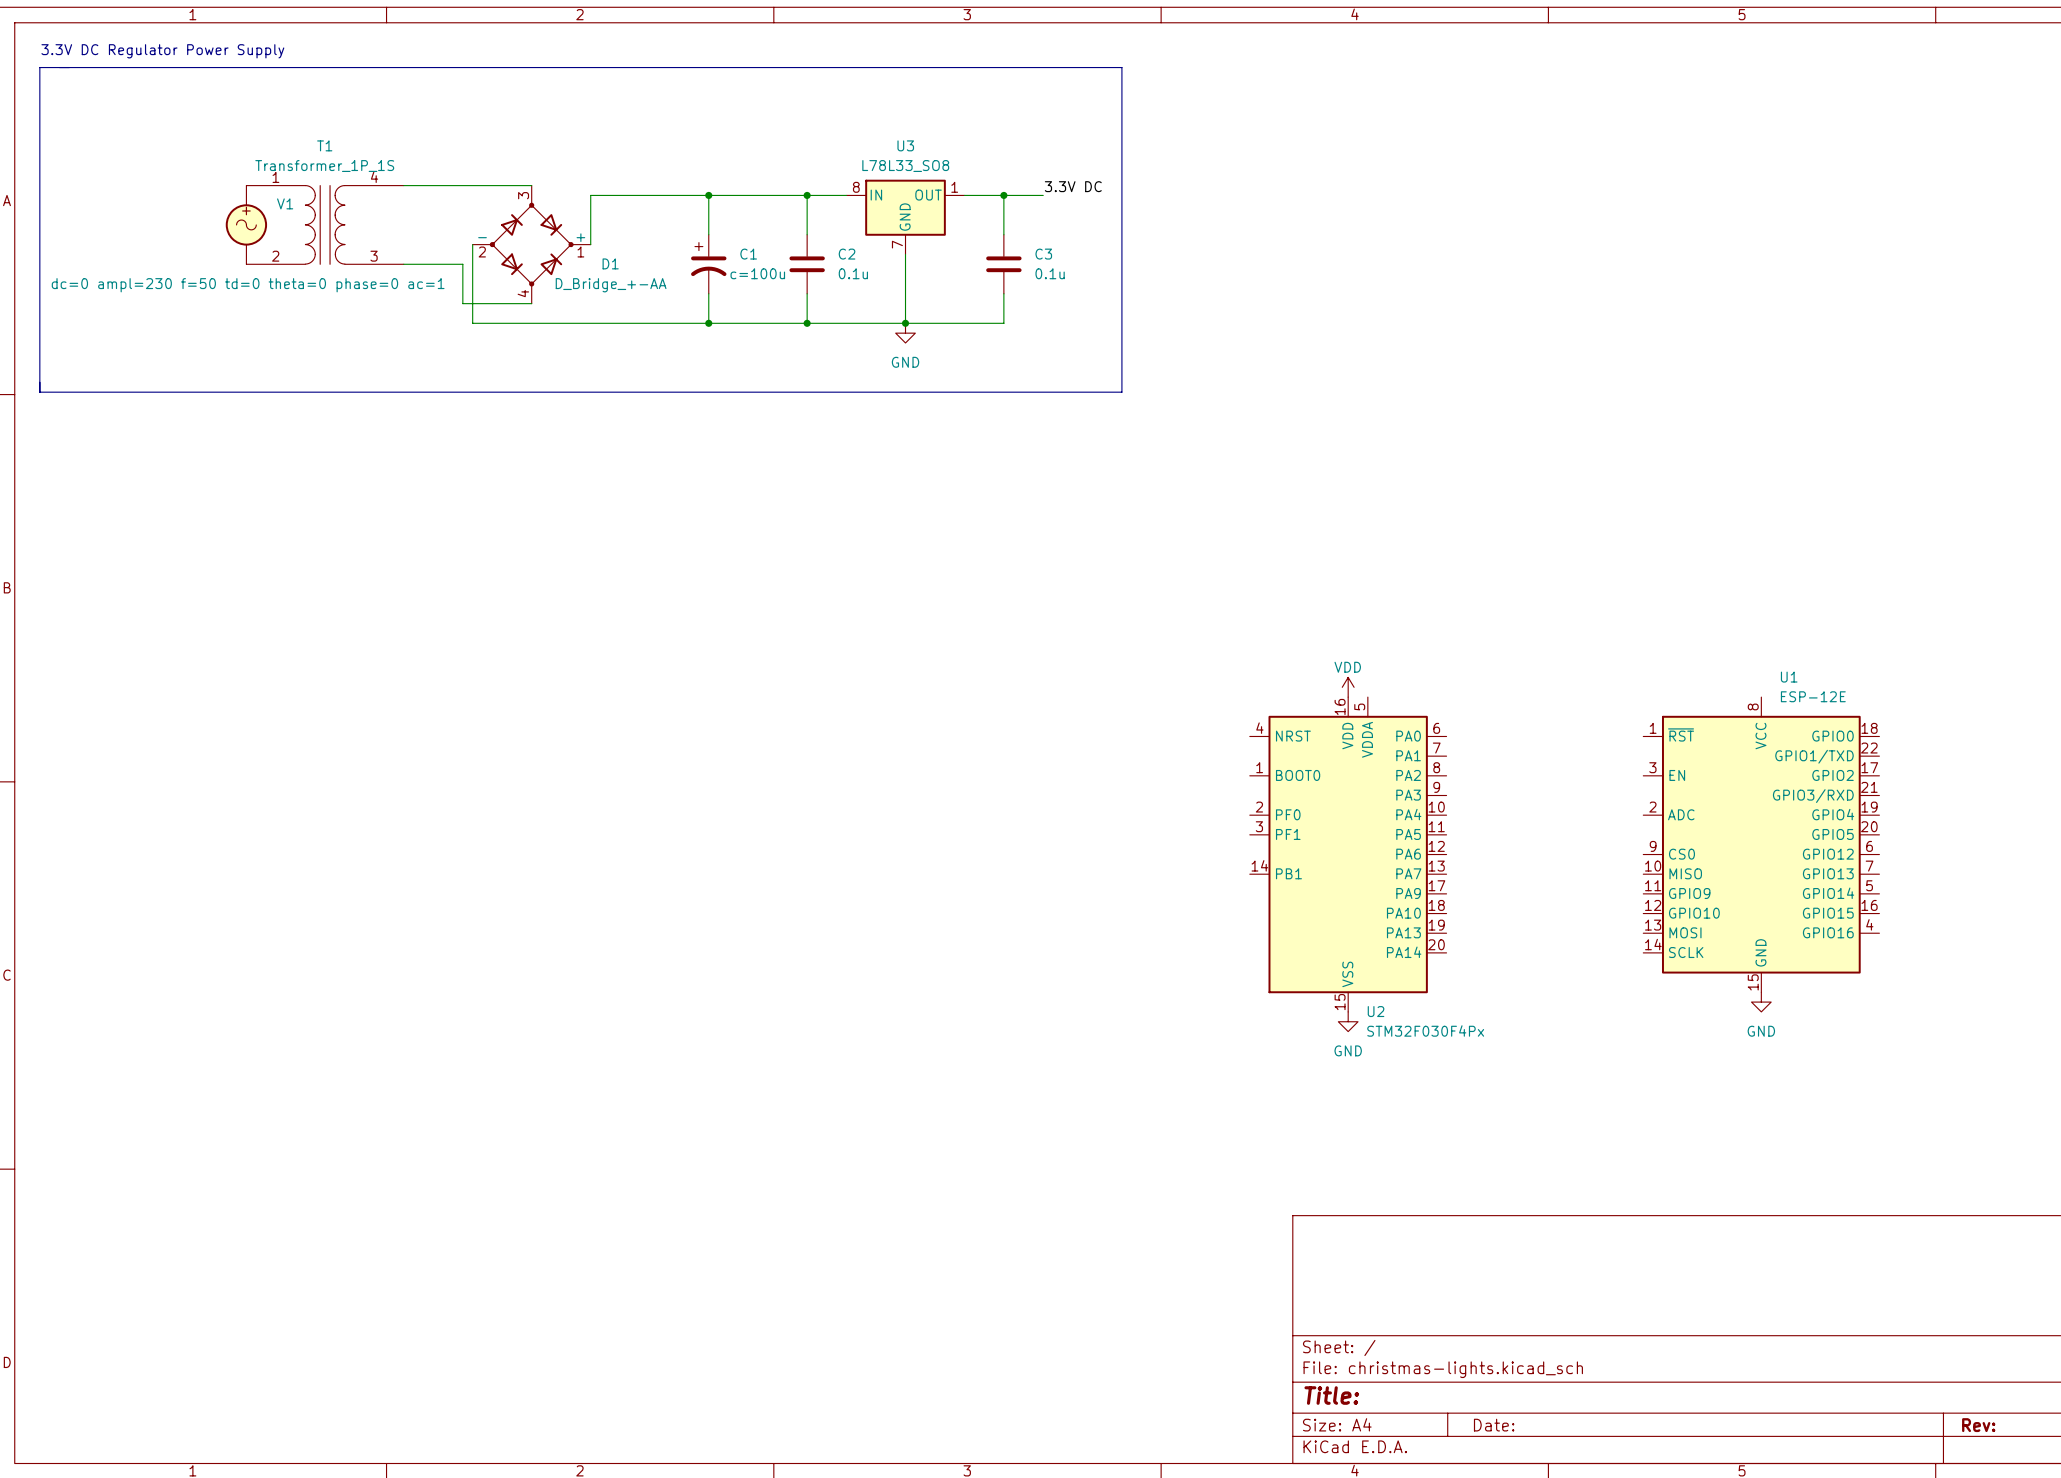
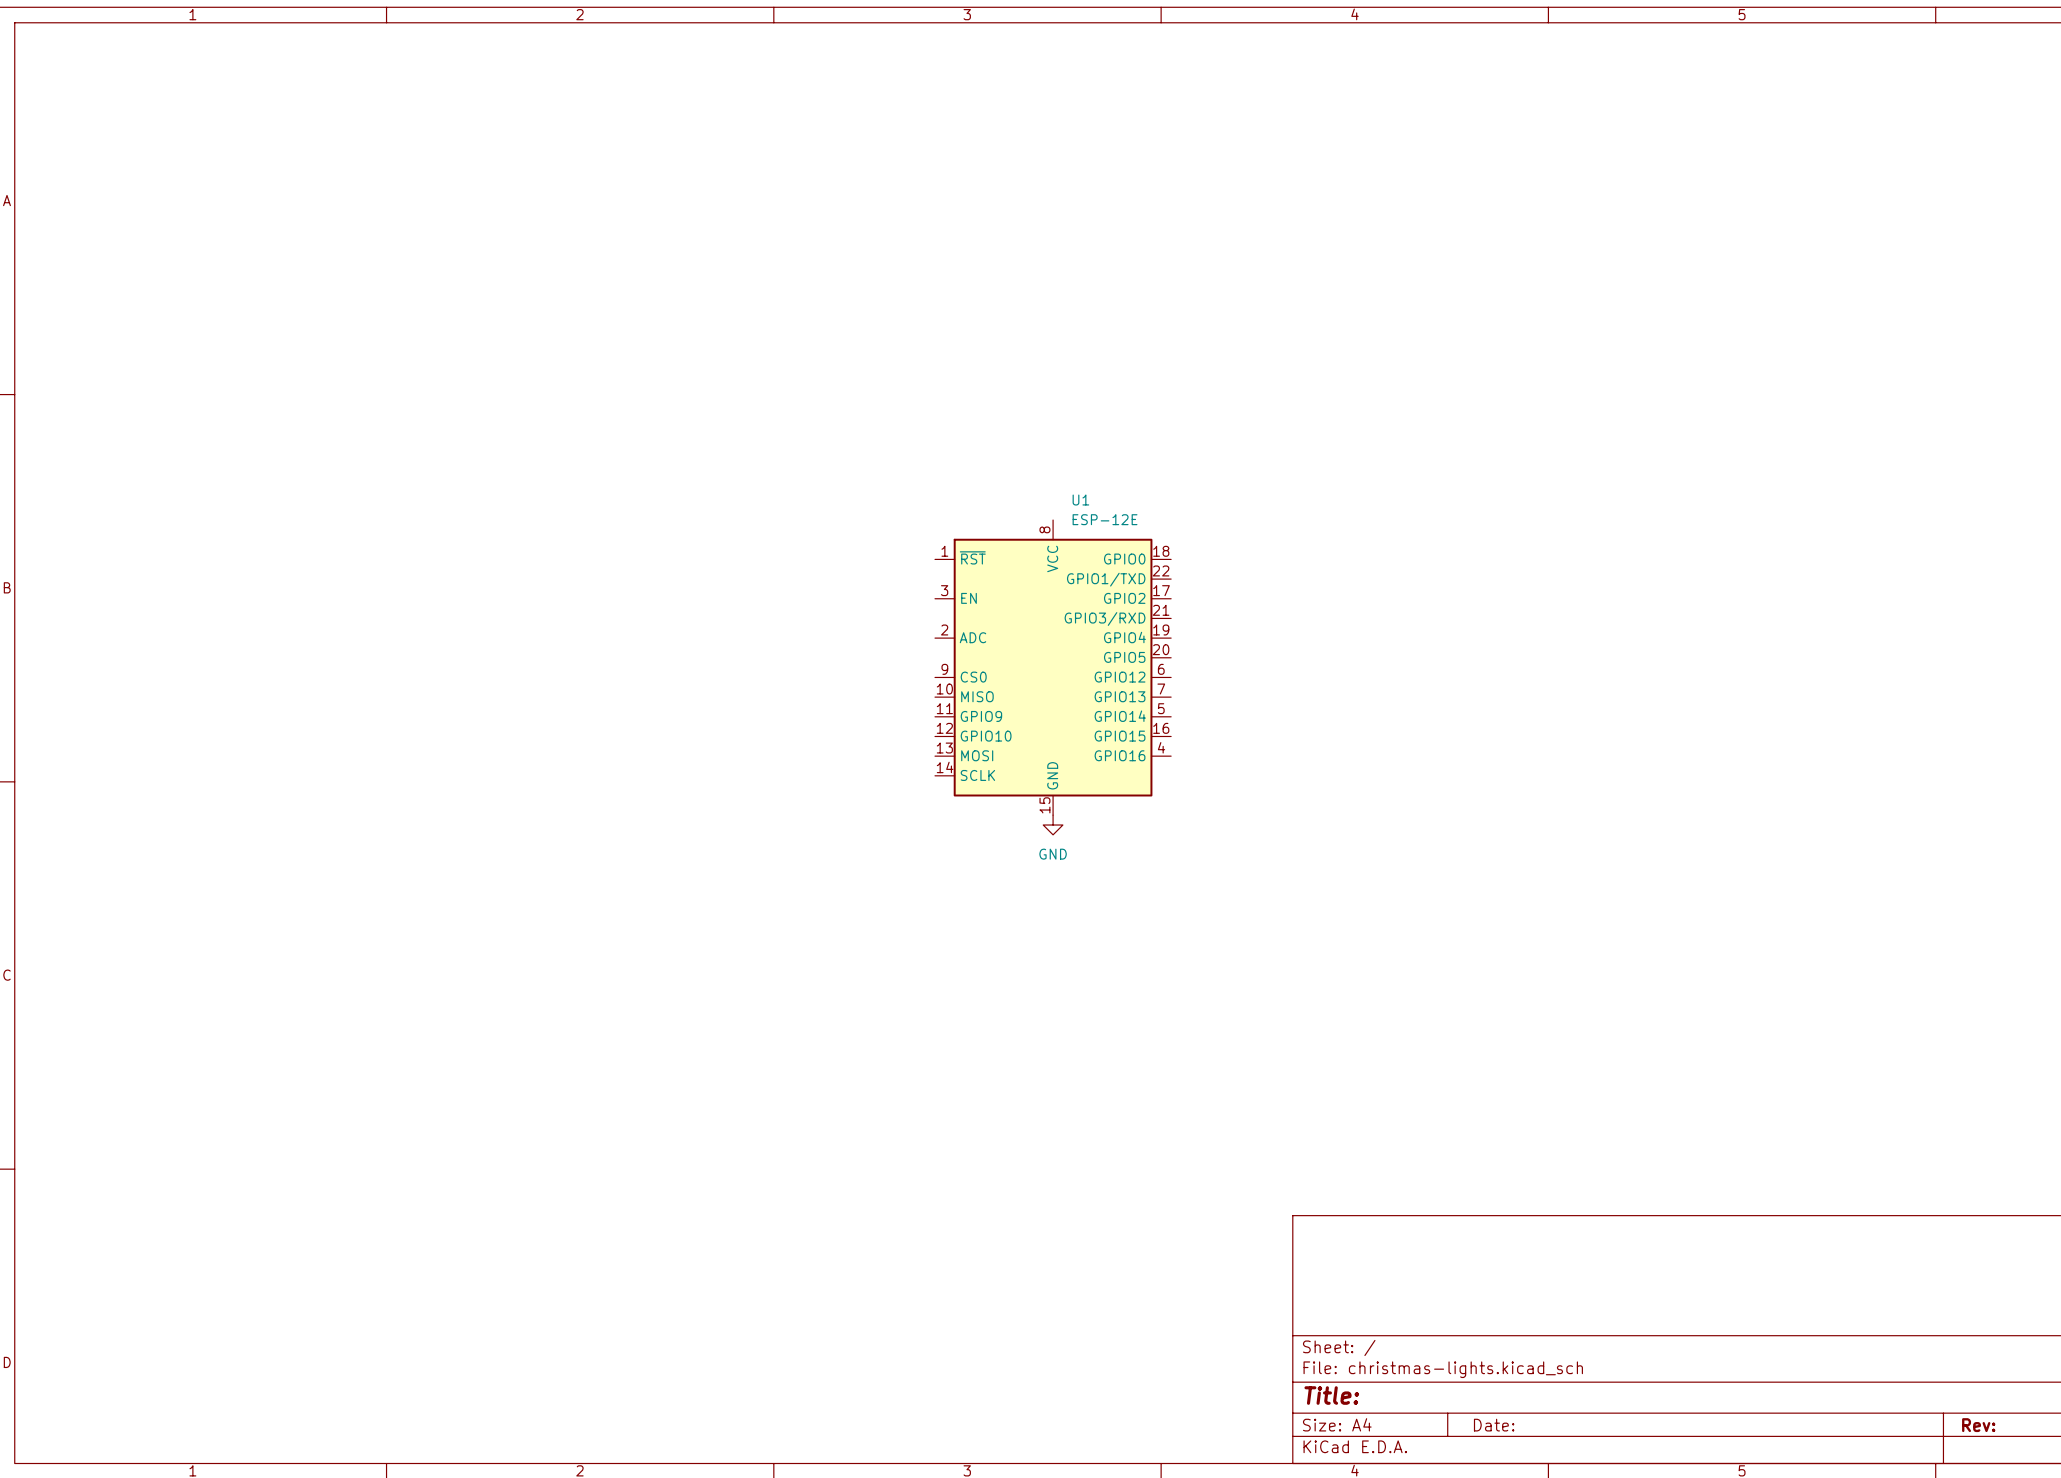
text: 3.3V DC Regulator Power Supply (162, 51) -> none
line: (39, 67) (1121, 67) (1121, 392) (39, 392) (39, 67) -> none
wire: (403, 185) (531, 185) -> none
label: 3.3V DC (1073, 186) -> none
wire: (708, 195) (708, 234) -> none
junction: (708, 195) -> none
wire: (807, 195) (807, 234) -> none
junction: (807, 195) -> none
wire: (846, 195) (590, 195) (590, 244) -> none
wire: (964, 195) (1043, 195) -> none
wire: (1003, 195) (1003, 234) -> none
junction: (1003, 195) -> none
U3: L78L33_SO8 (905, 217) -> none
V1: (246, 224) -> none
T1: Transformer_1P_1S (325, 224) -> none
wire: (472, 244) (472, 323) (1003, 323) (1003, 293) -> none
D1: D_Bridge_+-AA (531, 244) -> none
wire: (905, 254) (905, 323) -> none
wire: (403, 264) (462, 264) (462, 303) (531, 303) -> none
C1: c=100u (708, 264) -> none
C2: 0.1u (807, 264) -> none
C3: 0.1u (1003, 264) -> none
wire: (708, 293) (708, 323) -> none
wire: (807, 293) (807, 323) -> none
junction: (708, 323) -> none
junction: (807, 323) -> none
junction: (905, 323) -> none
power symbol: GND (905, 333) -> none
power symbol: VDD (1348, 687) -> none
power symbol: none -> GND (1053, 825)
U1 position: (1761, 844) -> (1053, 667)
U2: STM32F030F4Px (1348, 854) -> none
power symbol: GND (1761, 1002) -> none
power symbol: GND (1348, 1021) -> none

